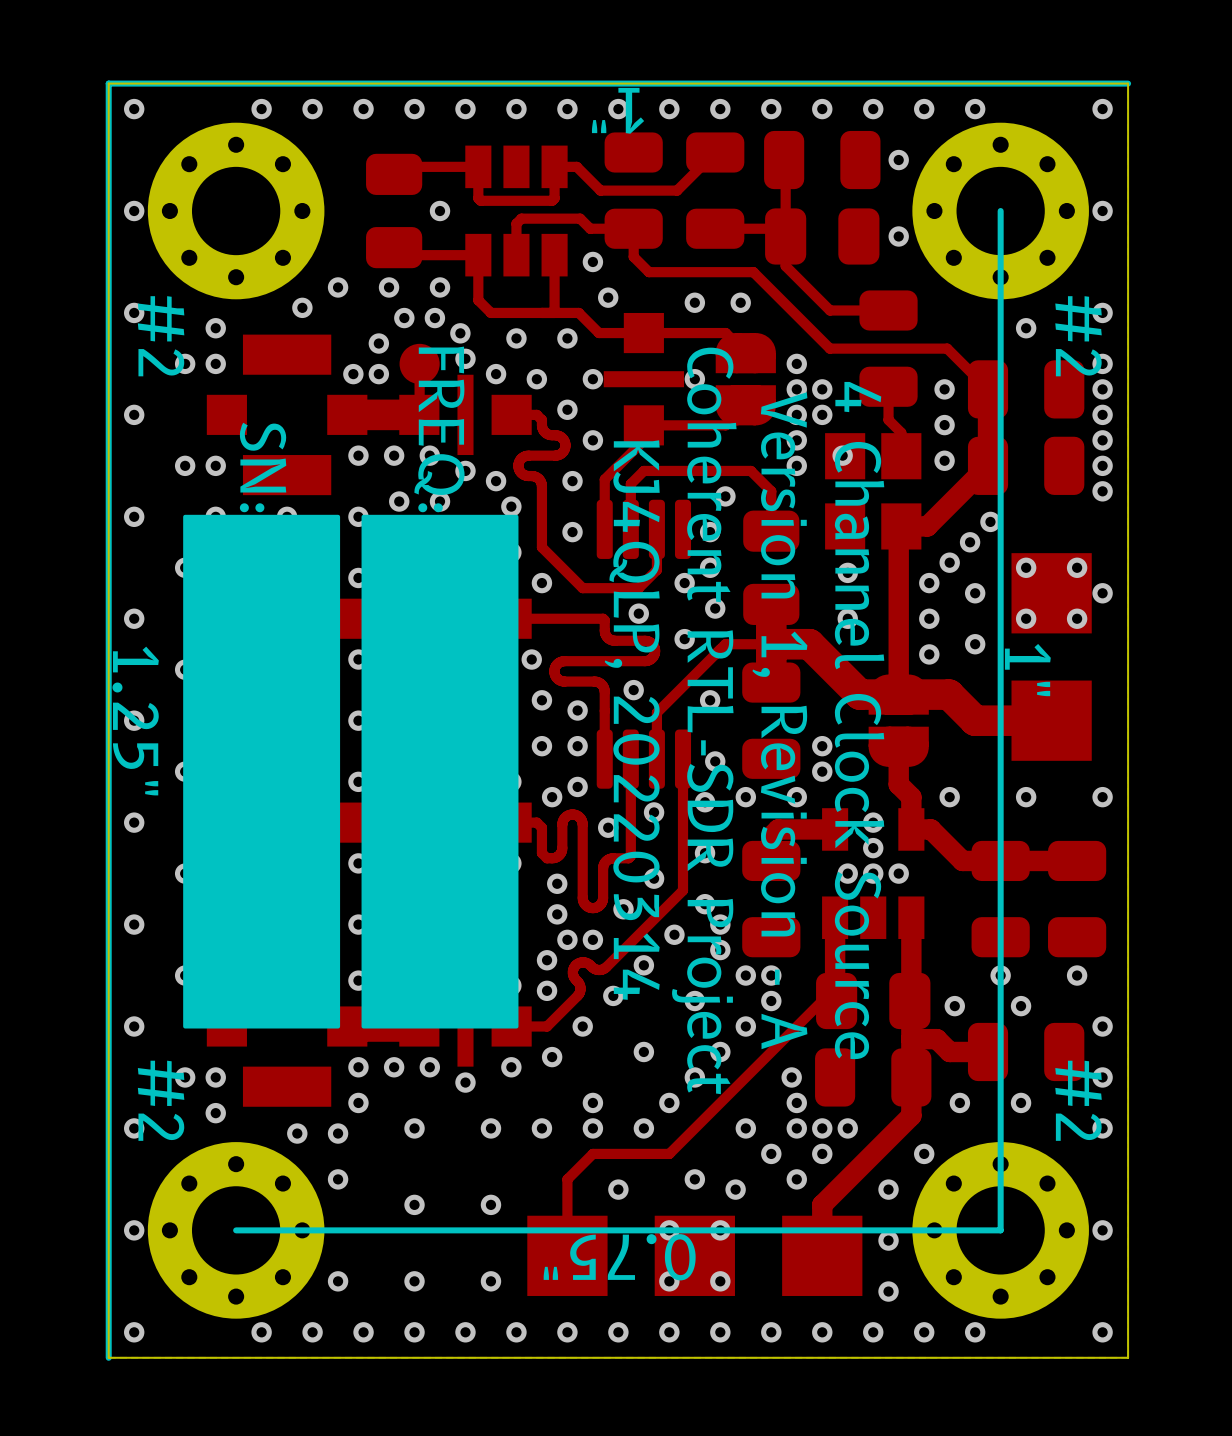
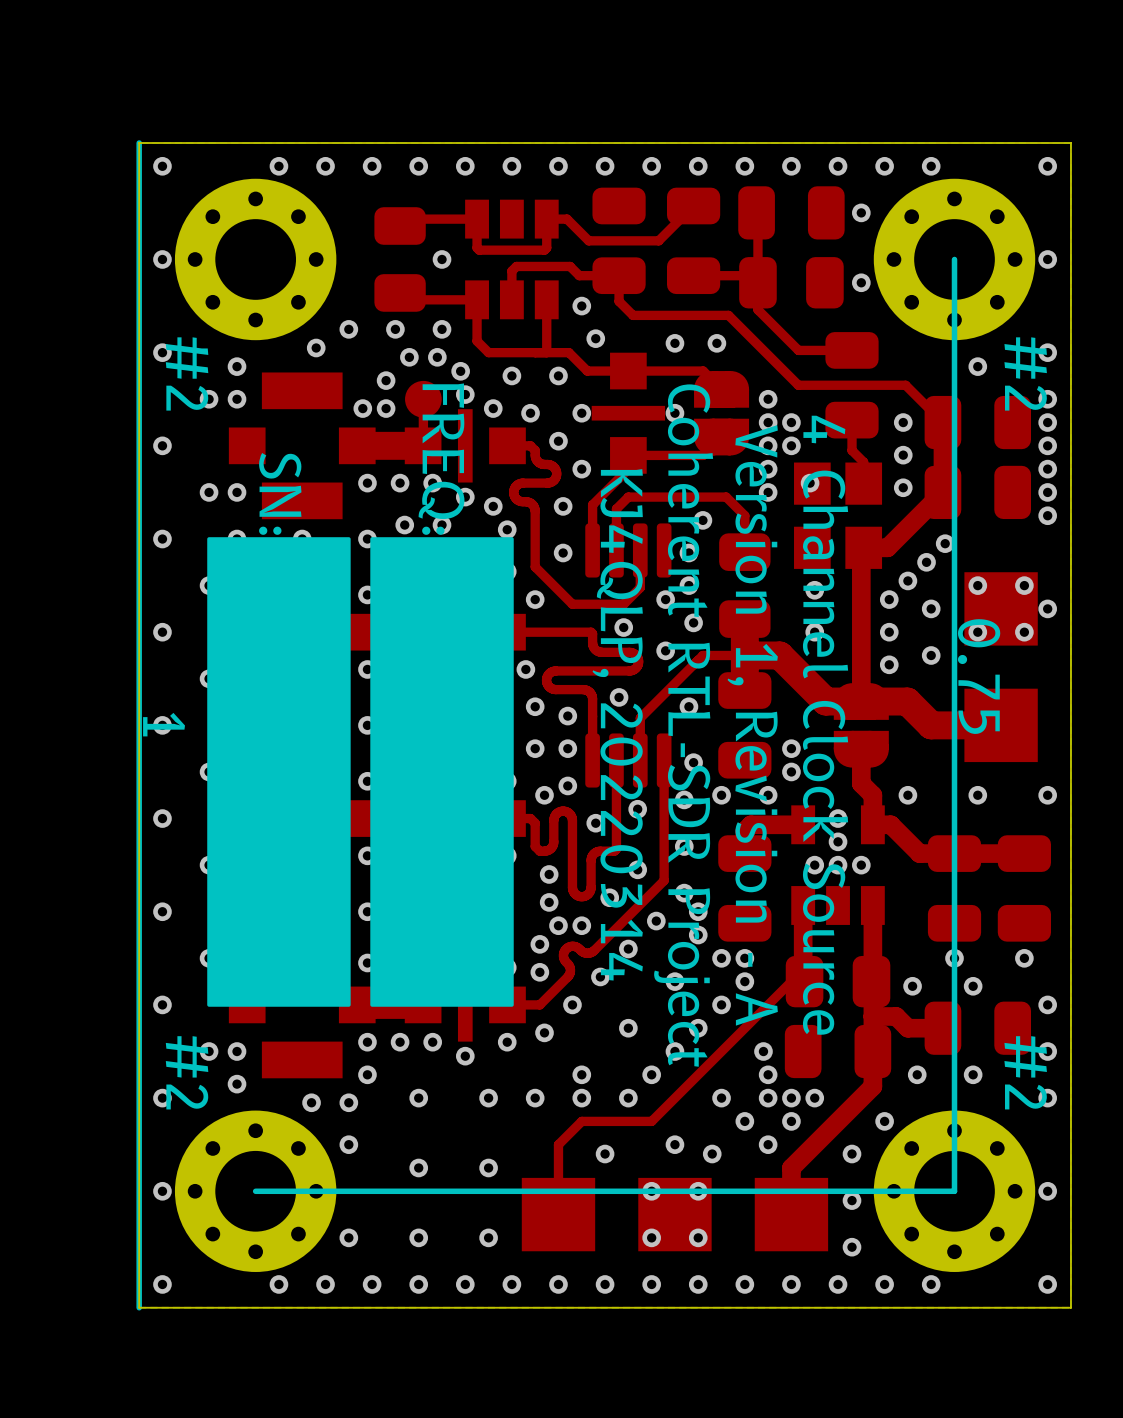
line: (1128, 83) (108, 83) -> none
text: 1" (618, 110) -> none
text: 1" (1027, 670) -> 0.75 (979, 676)
text: 1.25" (135, 721) -> 1 (164, 724)
text: 0.75" (619, 1257) -> none

